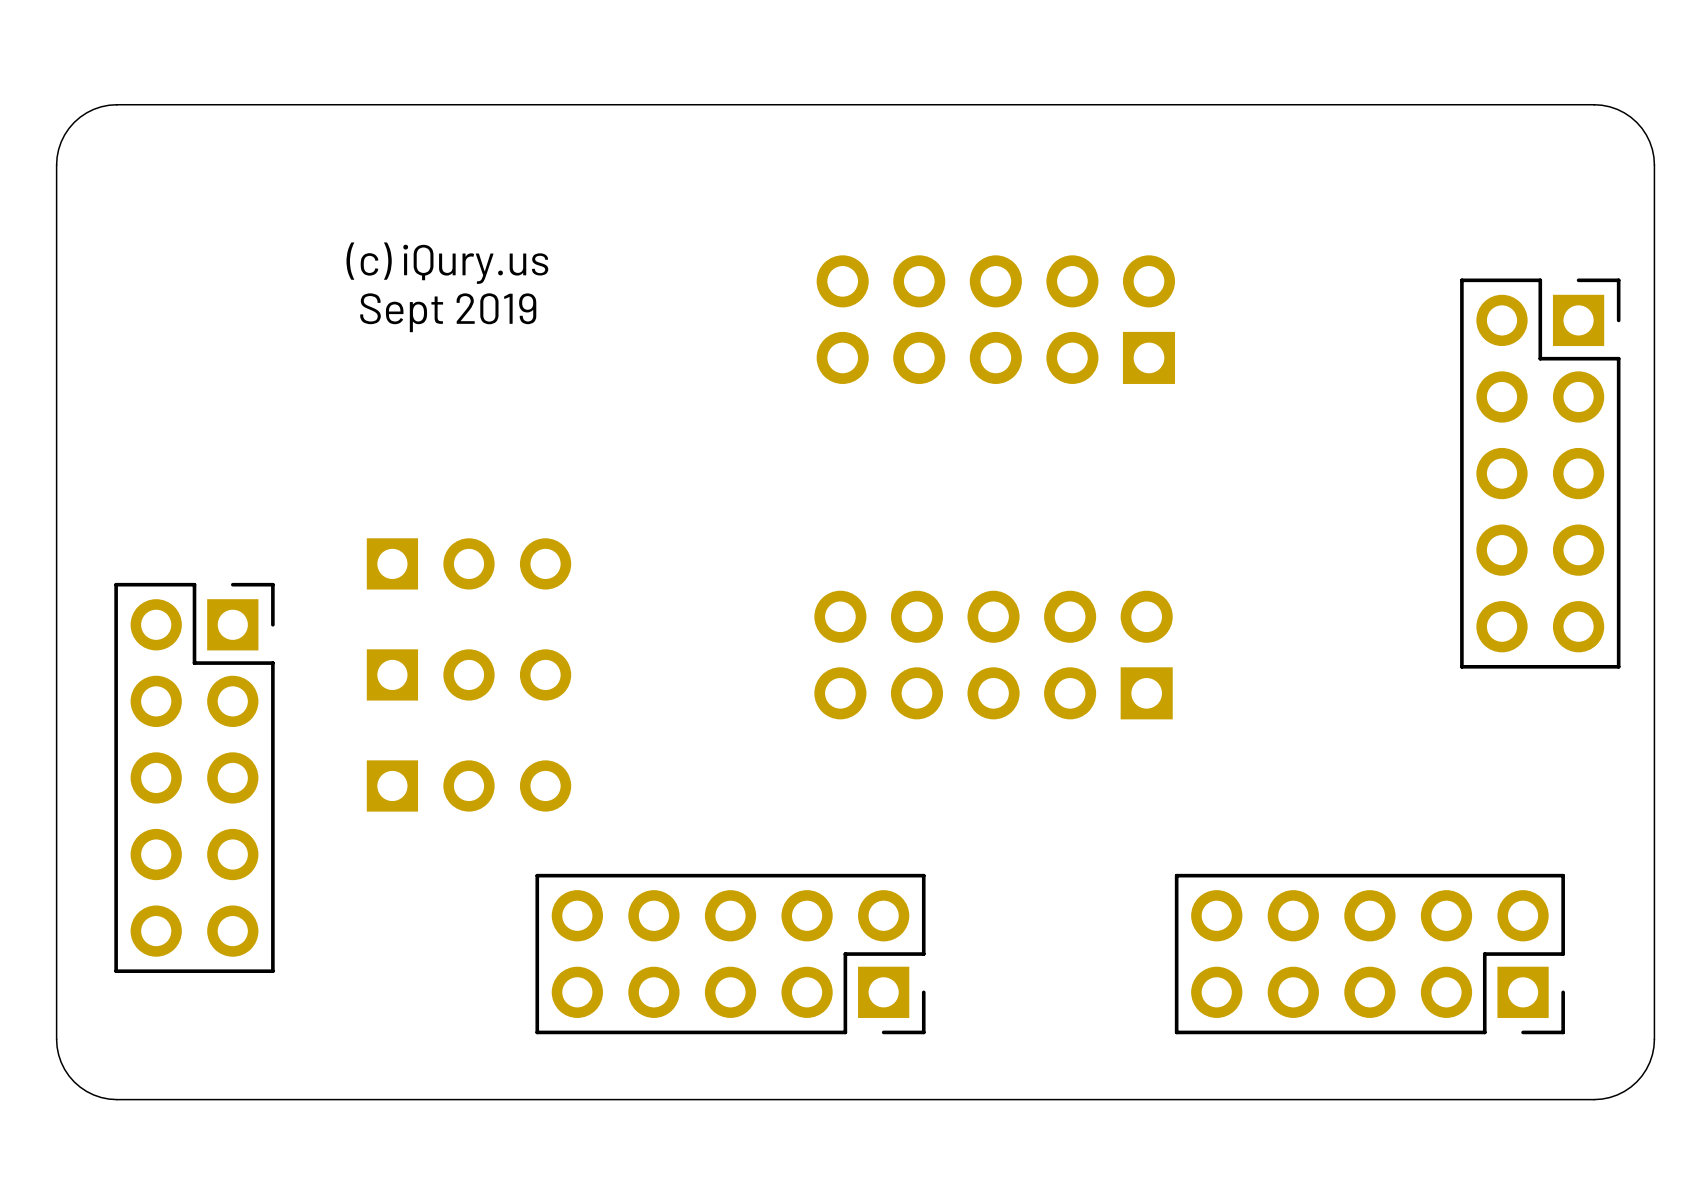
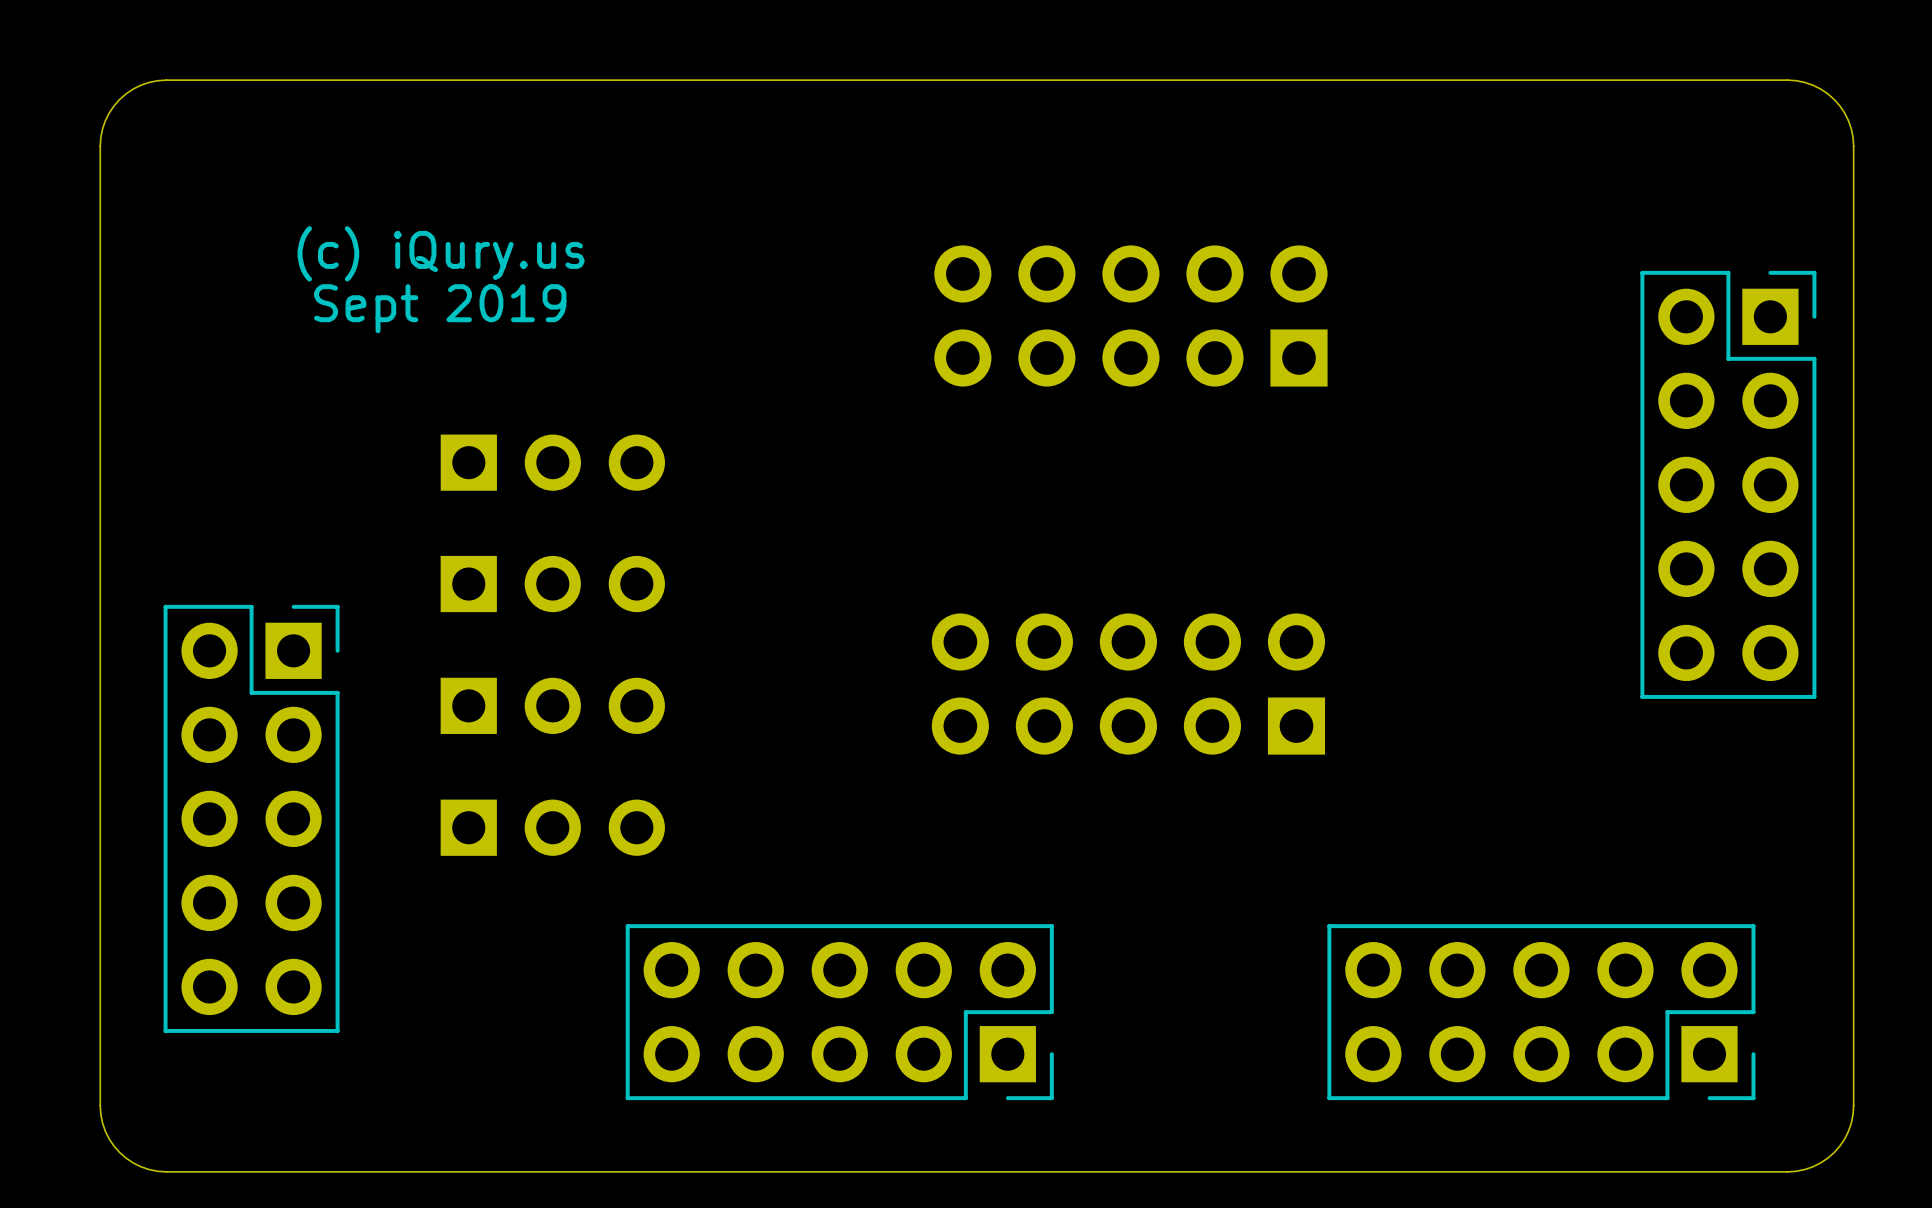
text position: (c) iQury.us (447, 263) -> (c) iQury.us (441, 253)
text position: Sept 2019 (448, 312) -> Sept 2019 (440, 308)
part: none -> (552, 462)

